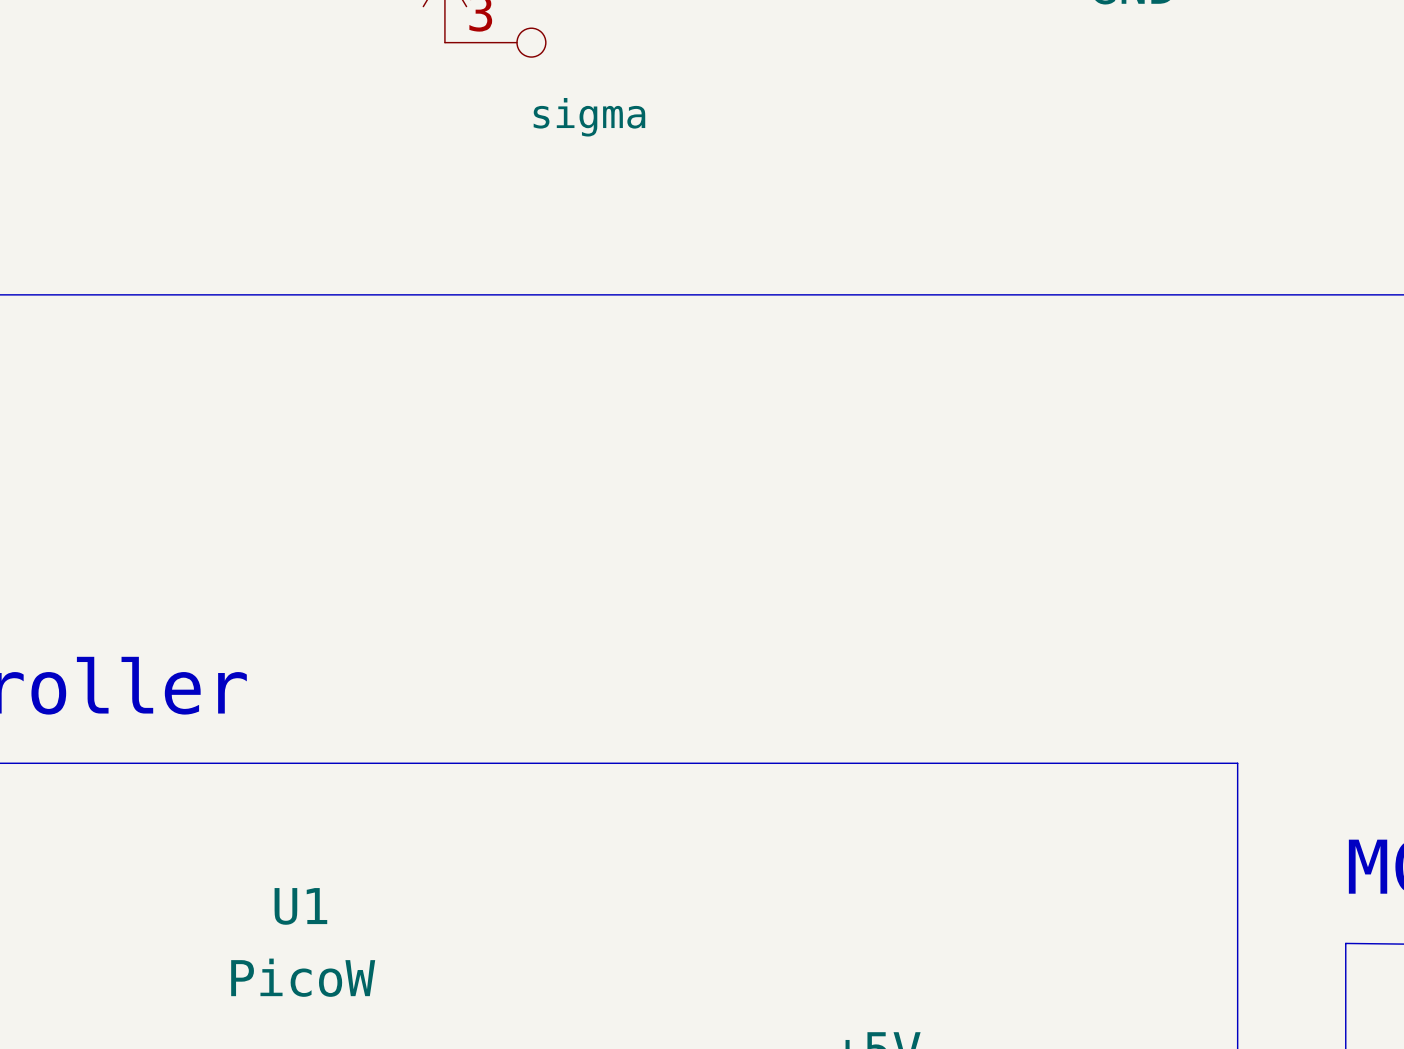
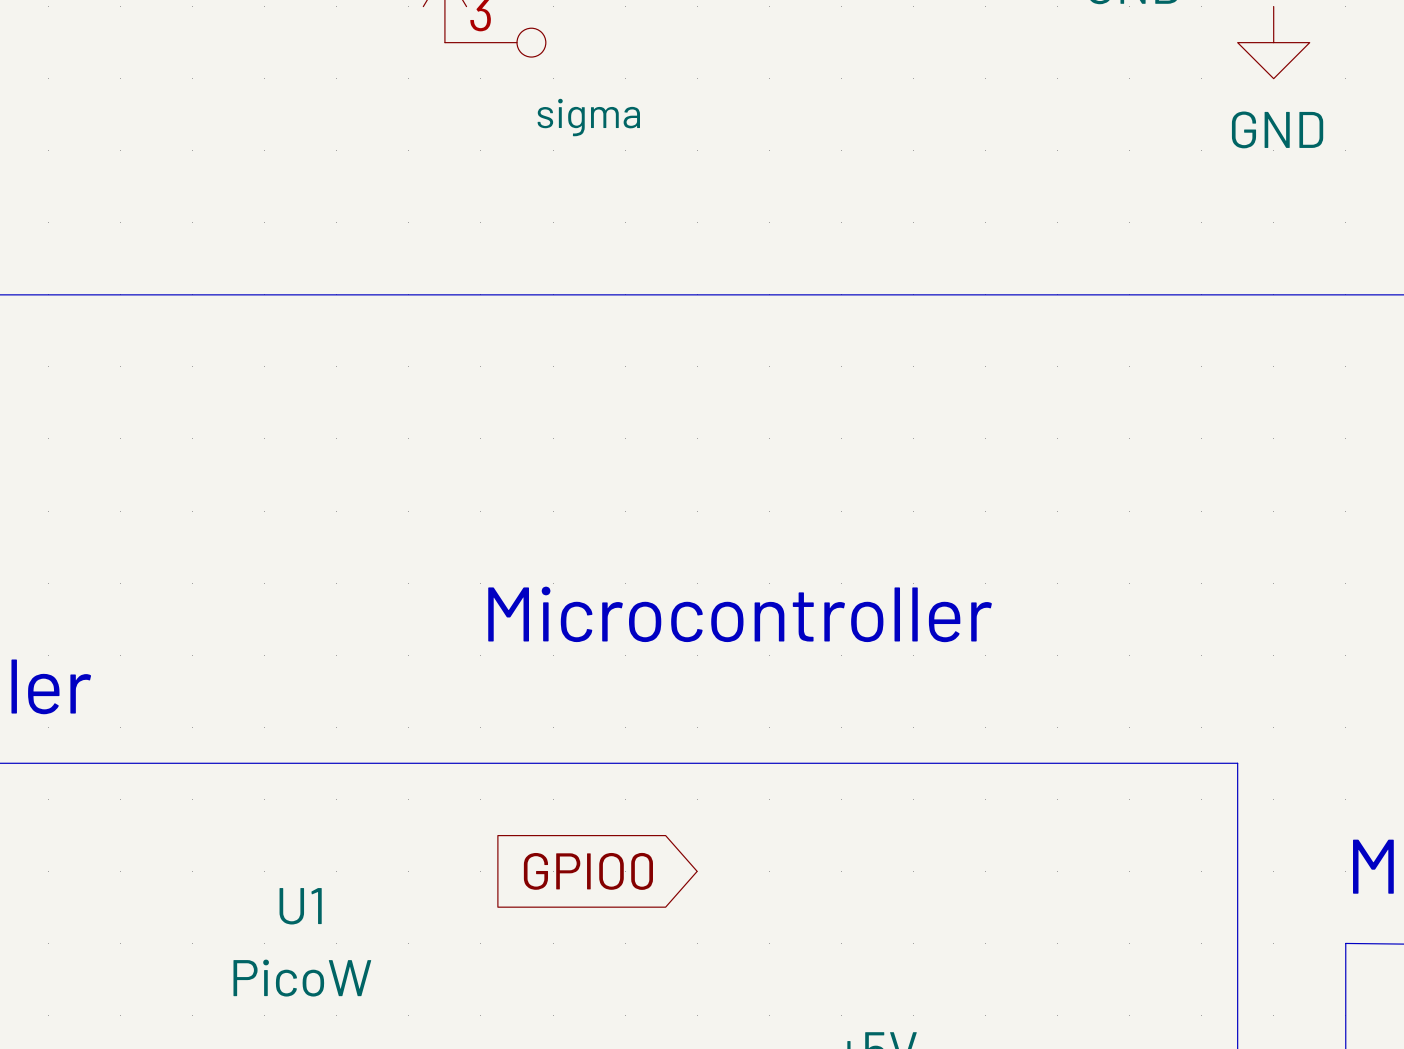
power symbol: none -> GND (1273, 42)
text: none -> Microcontroller (740, 614)
global label: none -> GPIO0 (588, 871)

